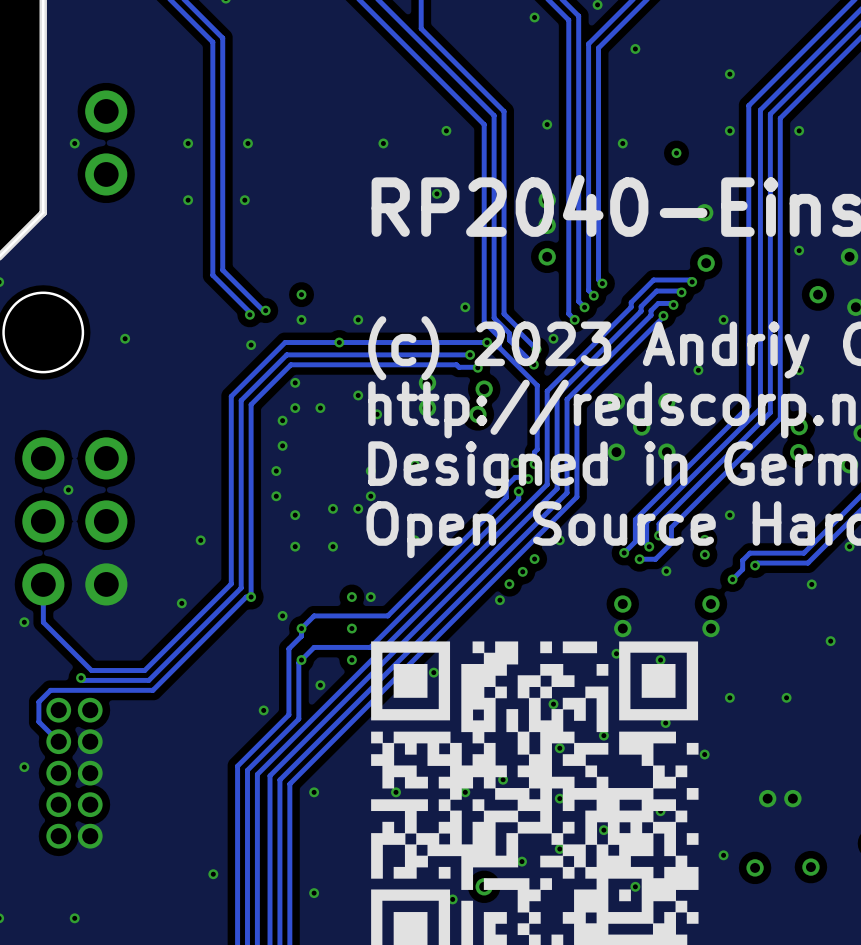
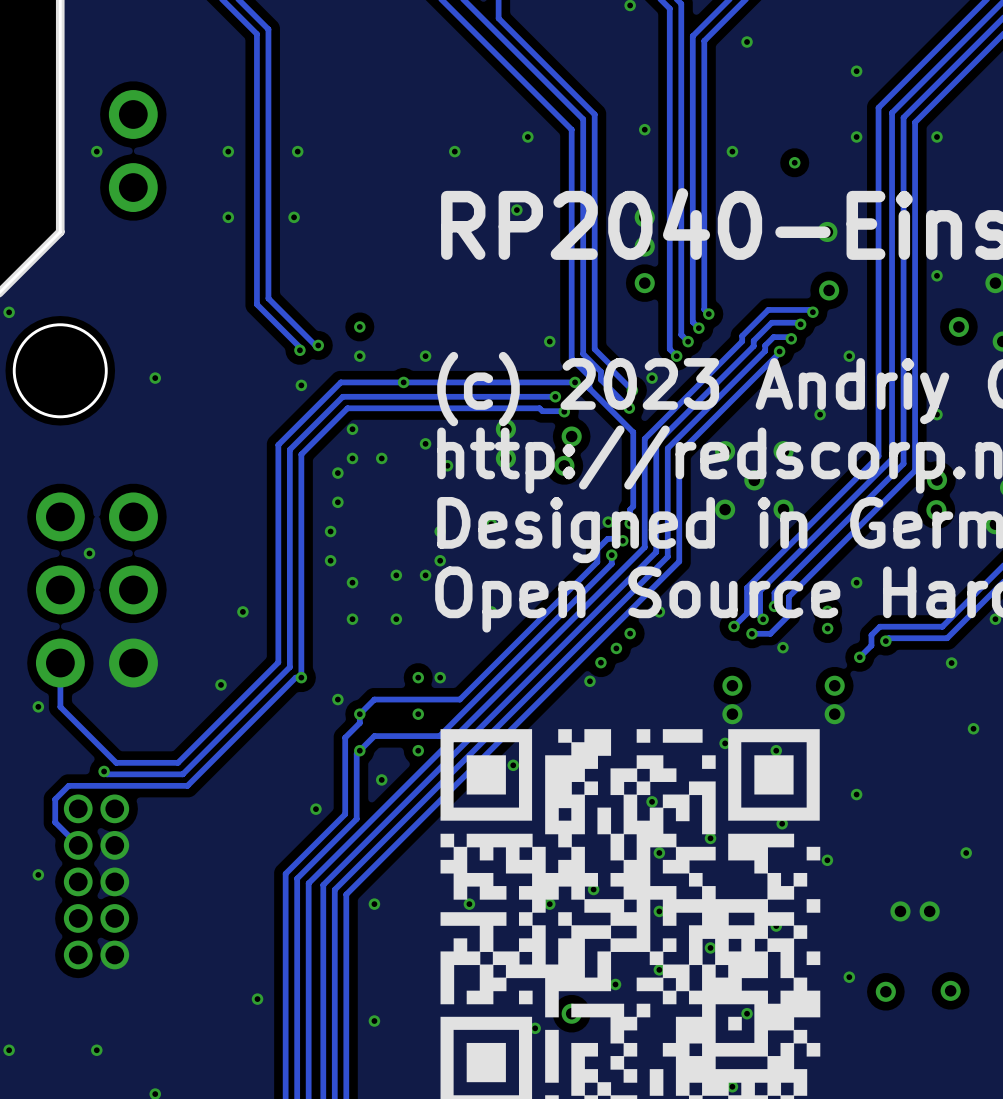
via position: (786, 697) -> (966, 852)

